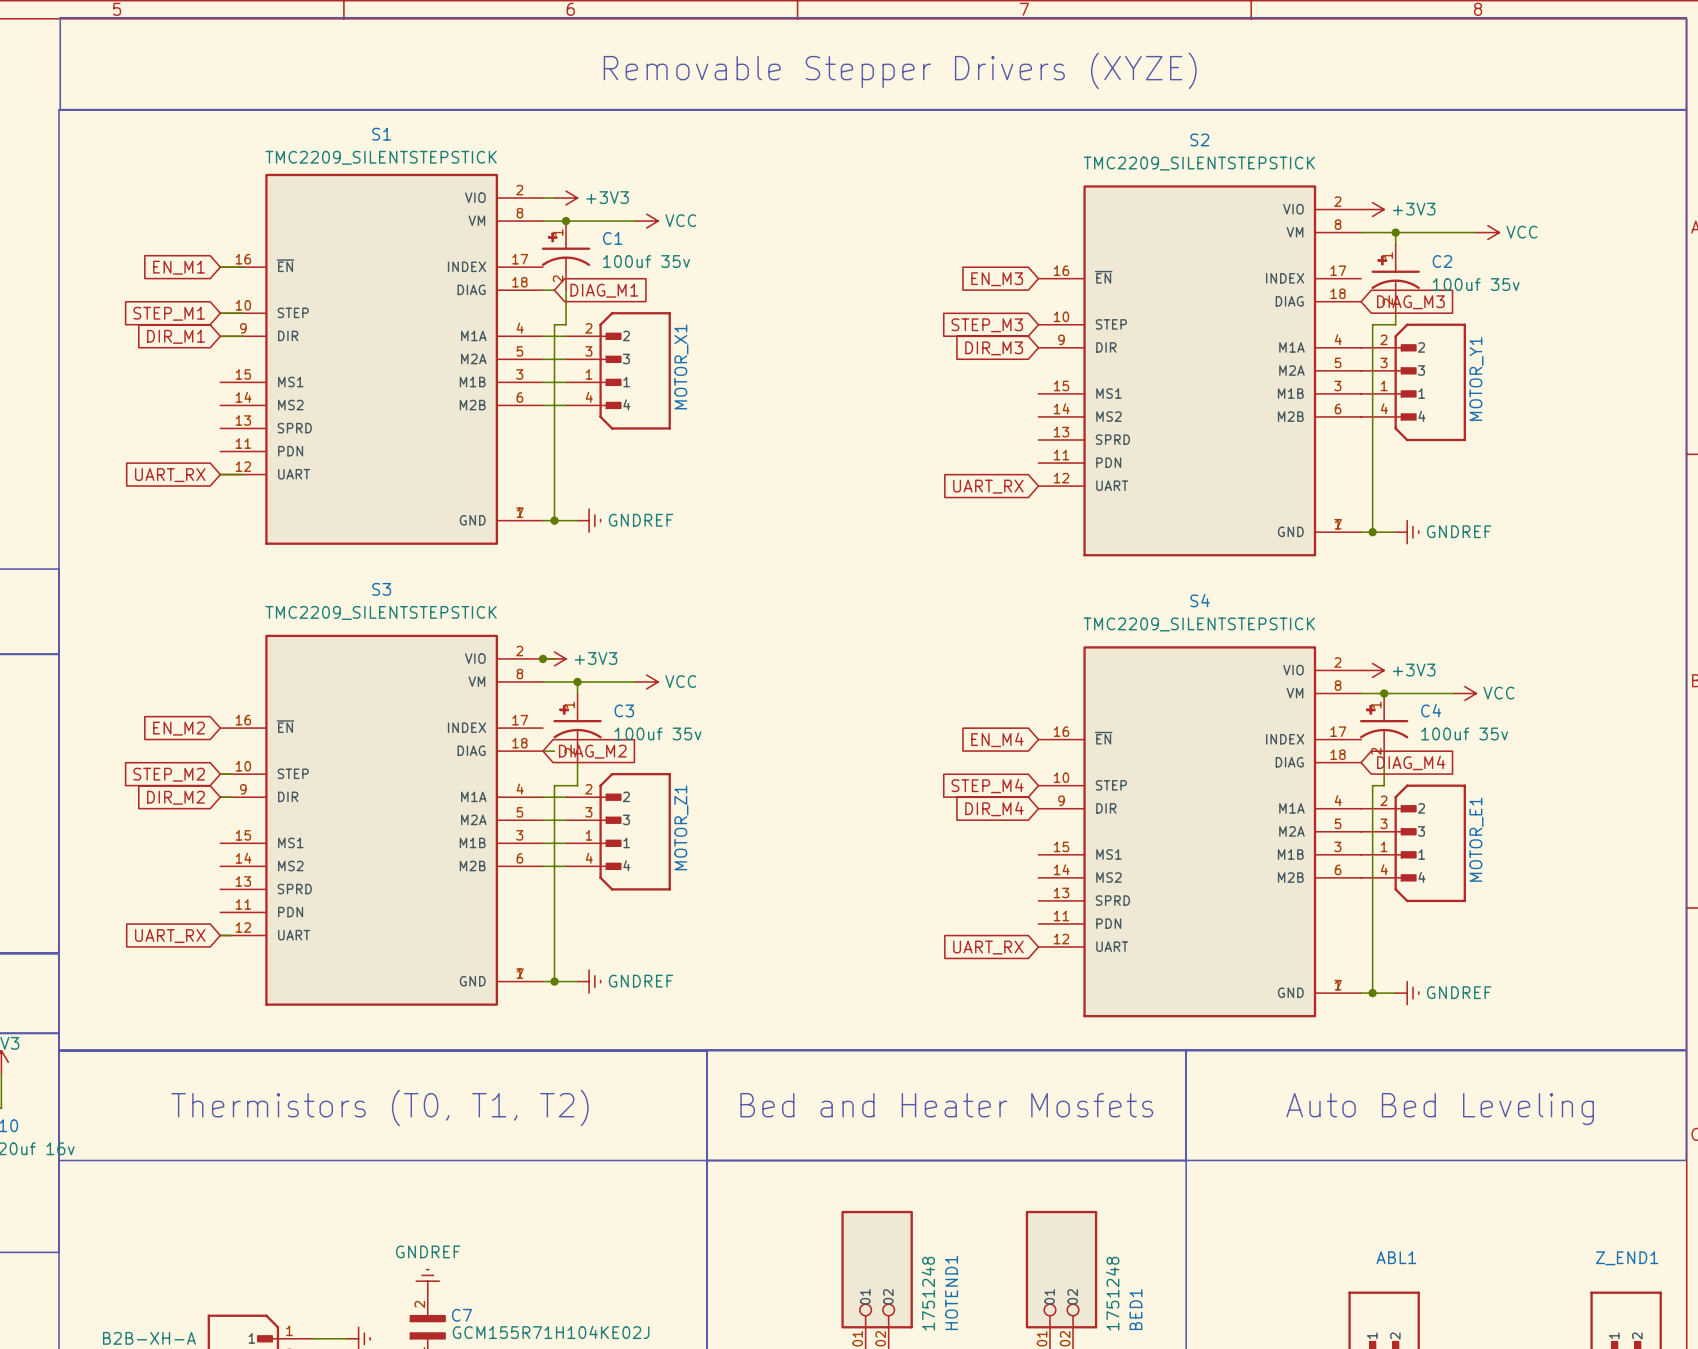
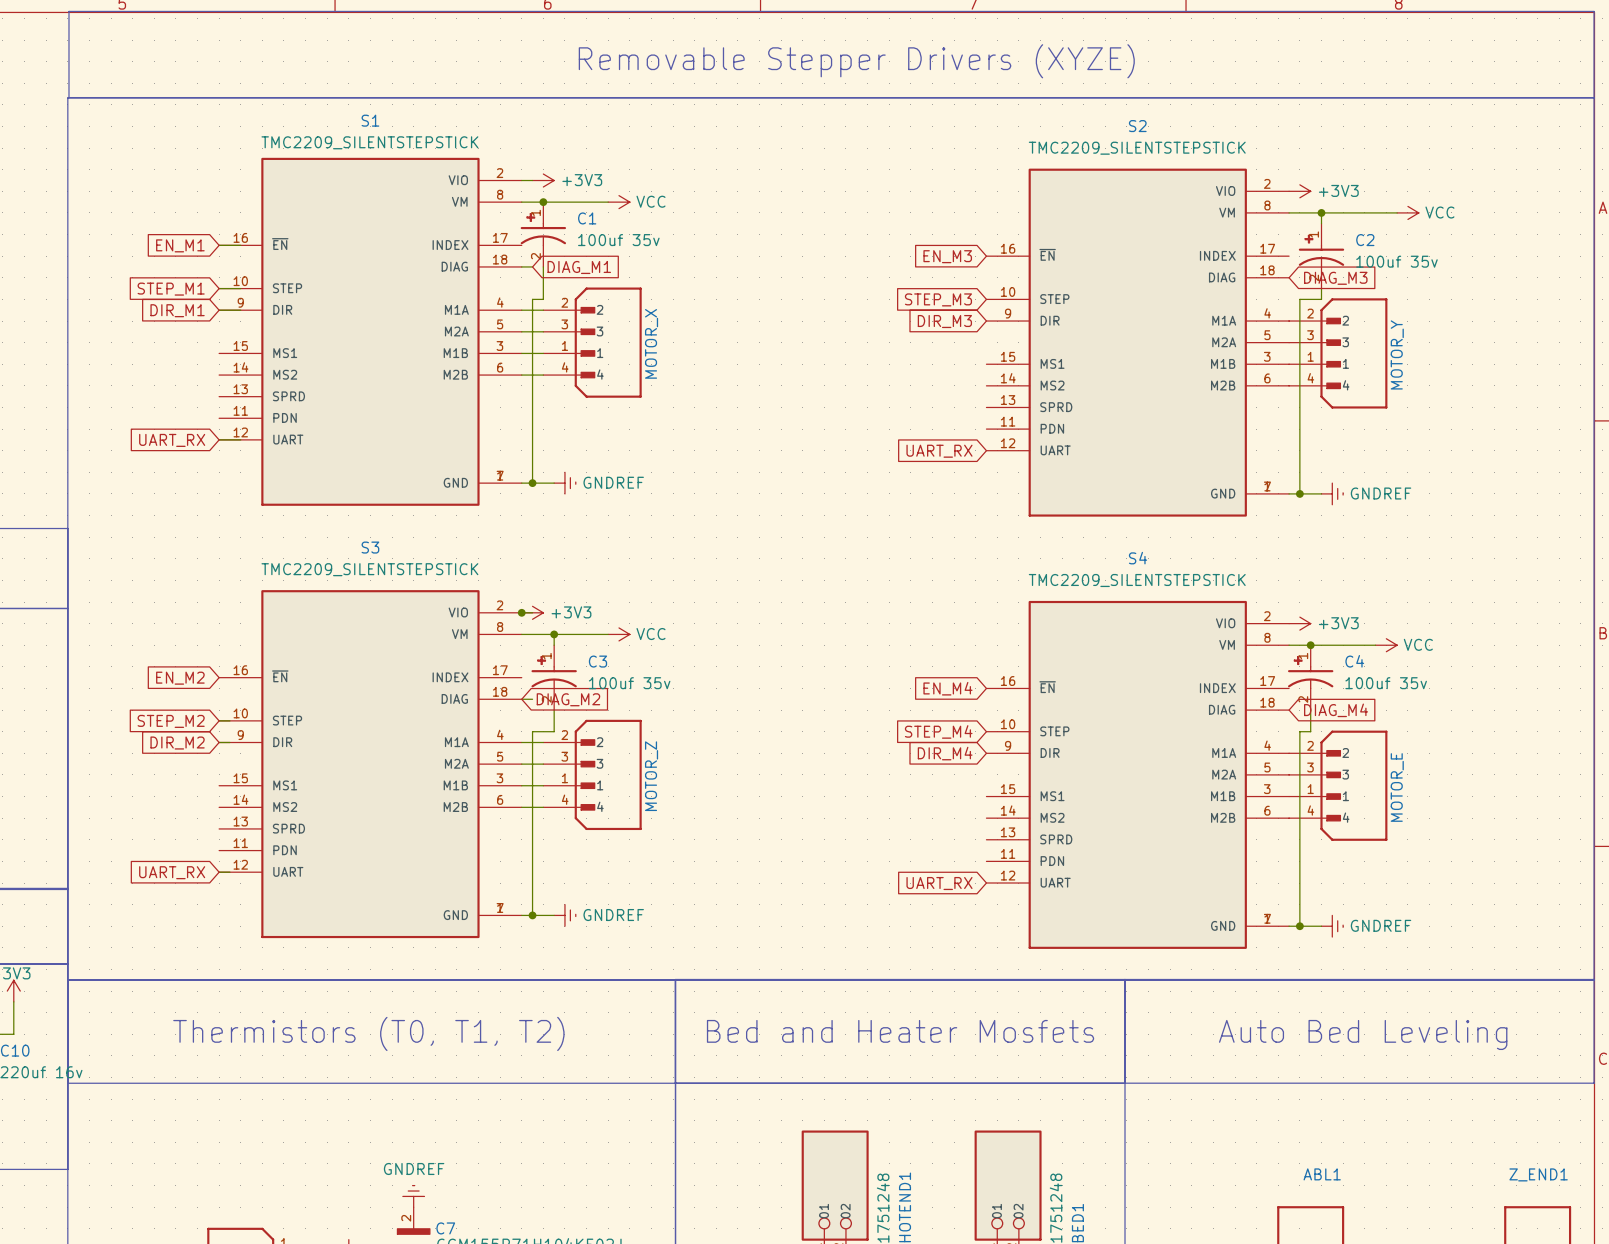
MOTOR_X1 name: MOTOR_X1 (681, 366) -> MOTOR_X (651, 343)
MOTOR_Y1 name: MOTOR_Y1 (1476, 379) -> MOTOR_Y (1397, 354)
MOTOR_Z1 name: MOTOR_Z1 (681, 827) -> MOTOR_Z (651, 776)
MOTOR_E1 name: MOTOR_E1 (1476, 839) -> MOTOR_E (1397, 787)

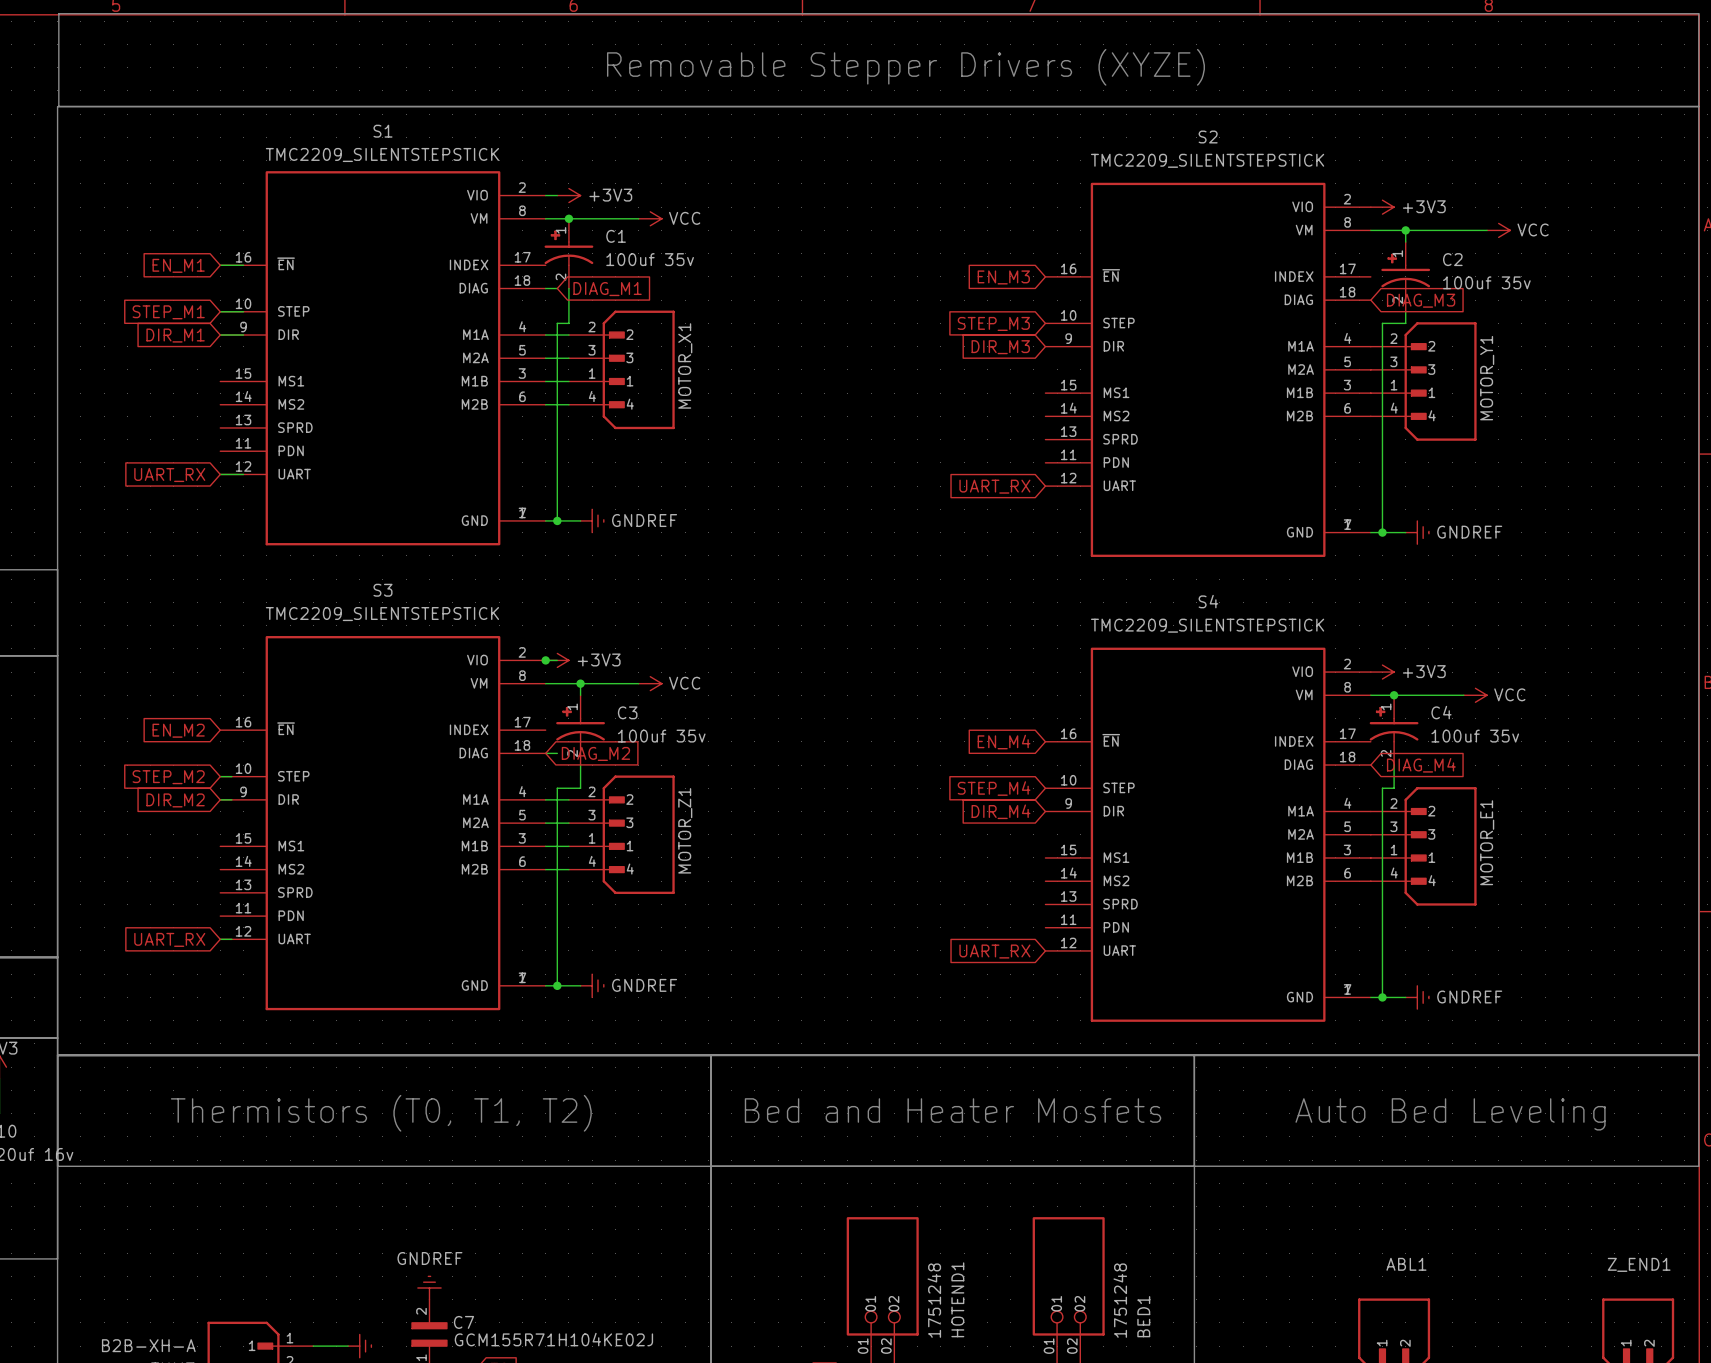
MOTOR_X name: MOTOR_X (651, 343) -> MOTOR_X1 (685, 365)
MOTOR_Y name: MOTOR_Y (1397, 354) -> MOTOR_Y1 (1487, 378)
MOTOR_Z name: MOTOR_Z (651, 776) -> MOTOR_Z1 (685, 830)
MOTOR_E name: MOTOR_E (1397, 787) -> MOTOR_E1 (1487, 842)

